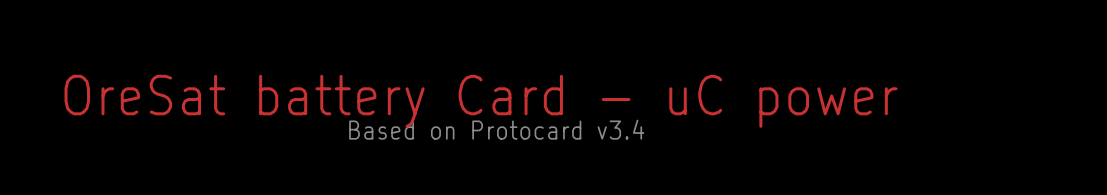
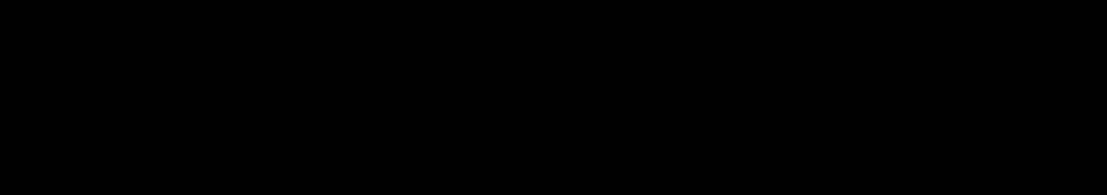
text: OreSat battery Card - uC power (481, 101) -> none
text: Based on Protocard v3.4 (496, 129) -> none

